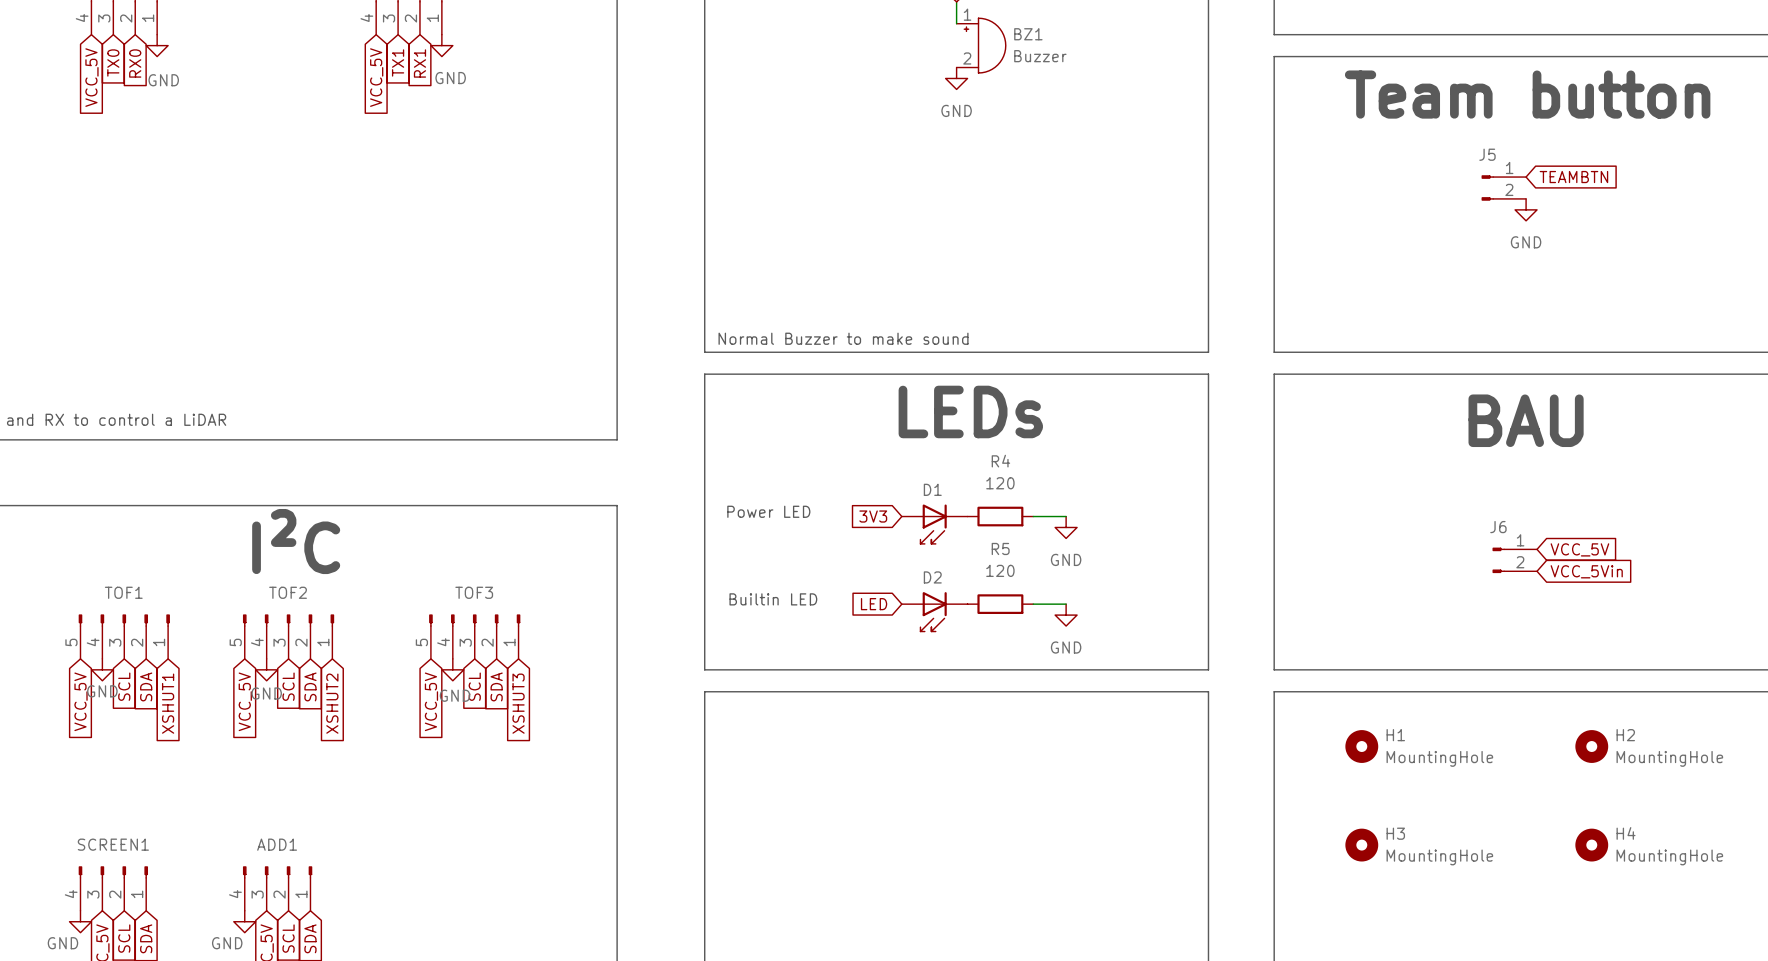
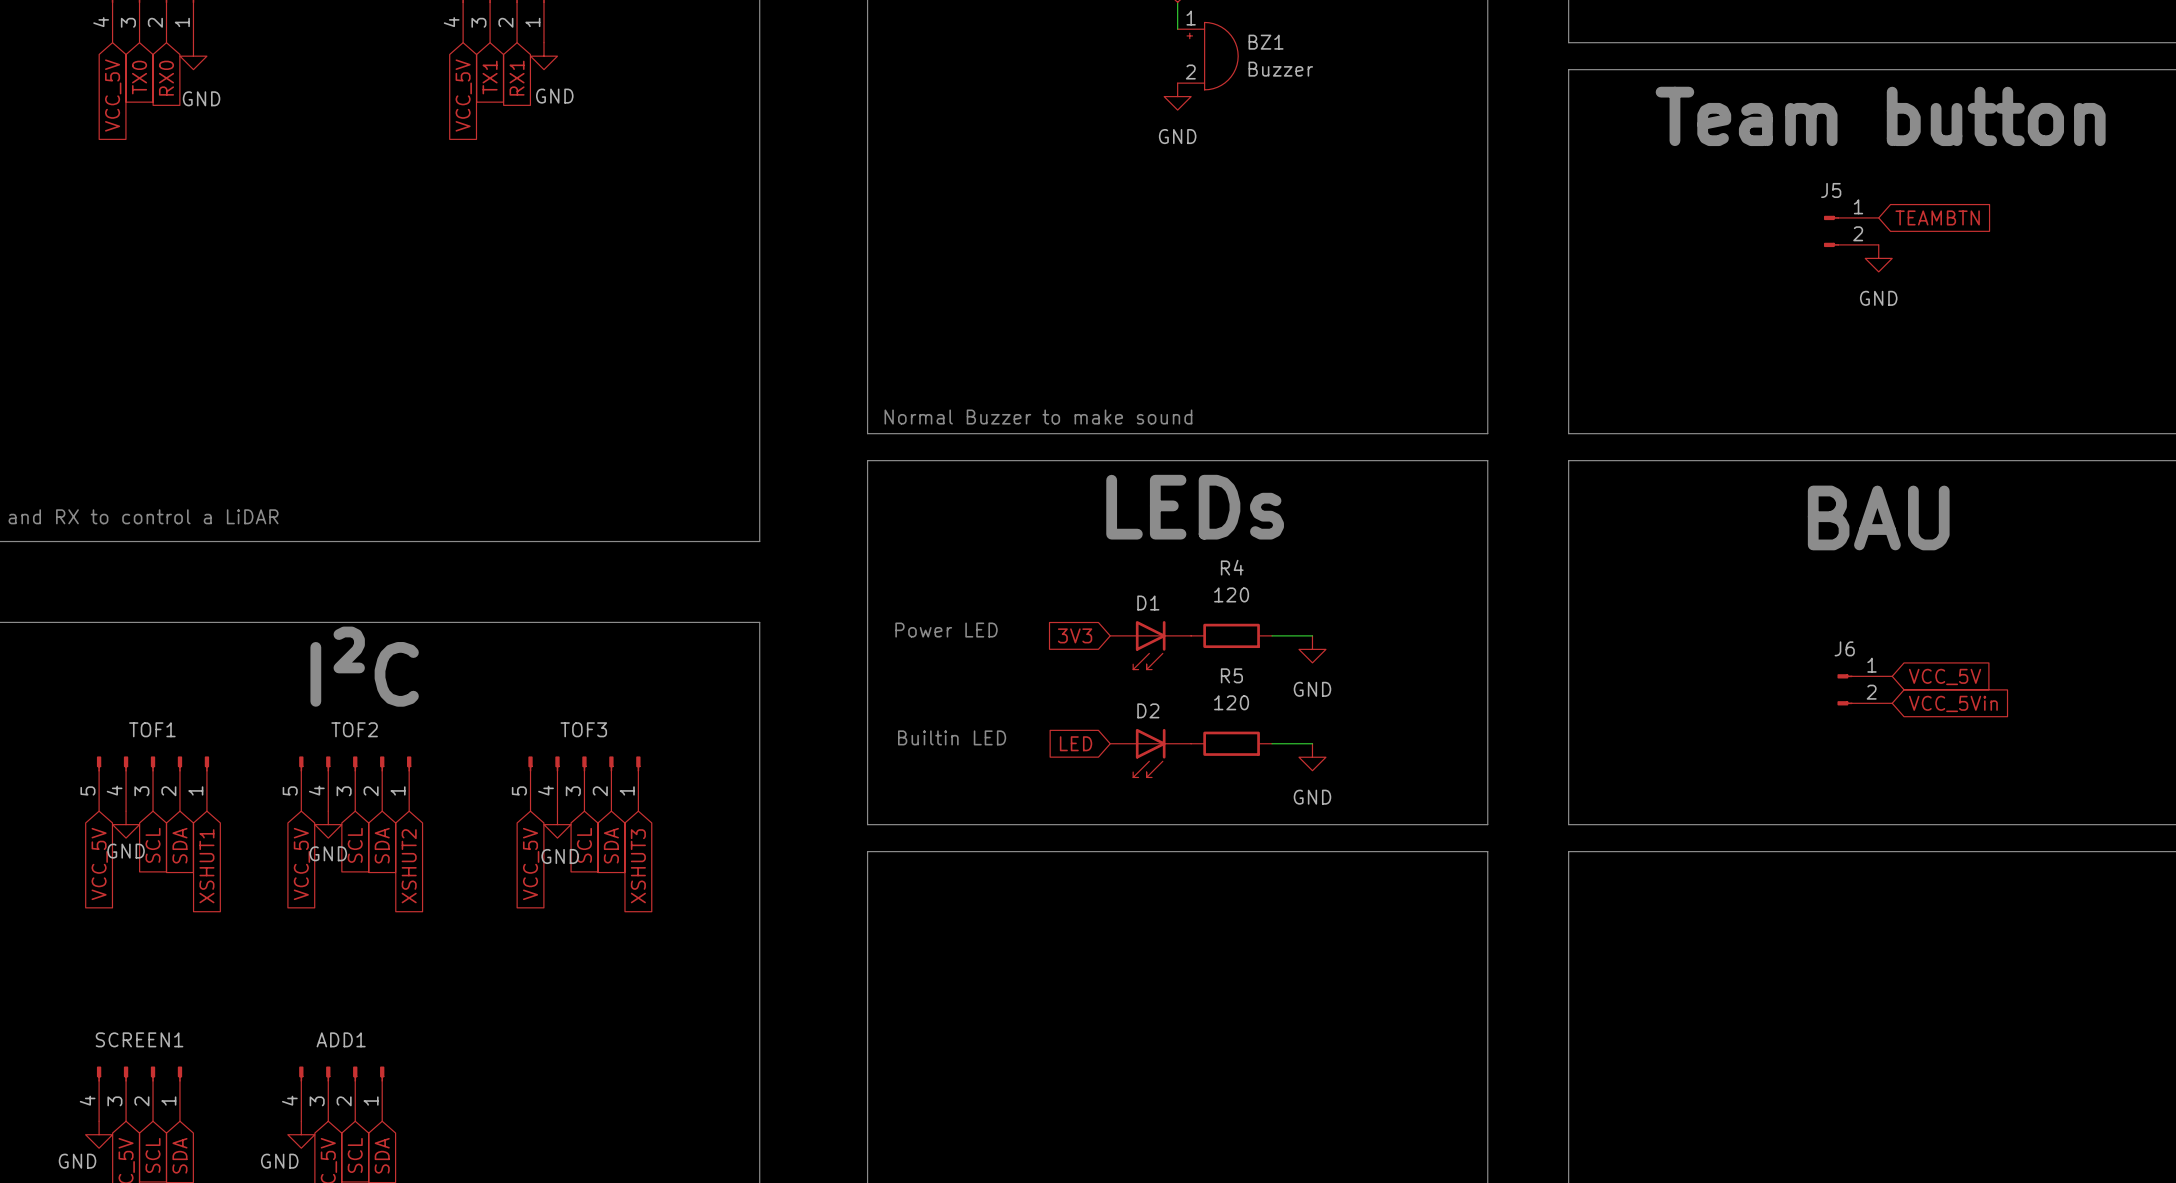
H1: MountingHole (1361, 746) -> none
H2: MountingHole (1591, 746) -> none
H3: MountingHole (1361, 845) -> none
H4: MountingHole (1591, 845) -> none

